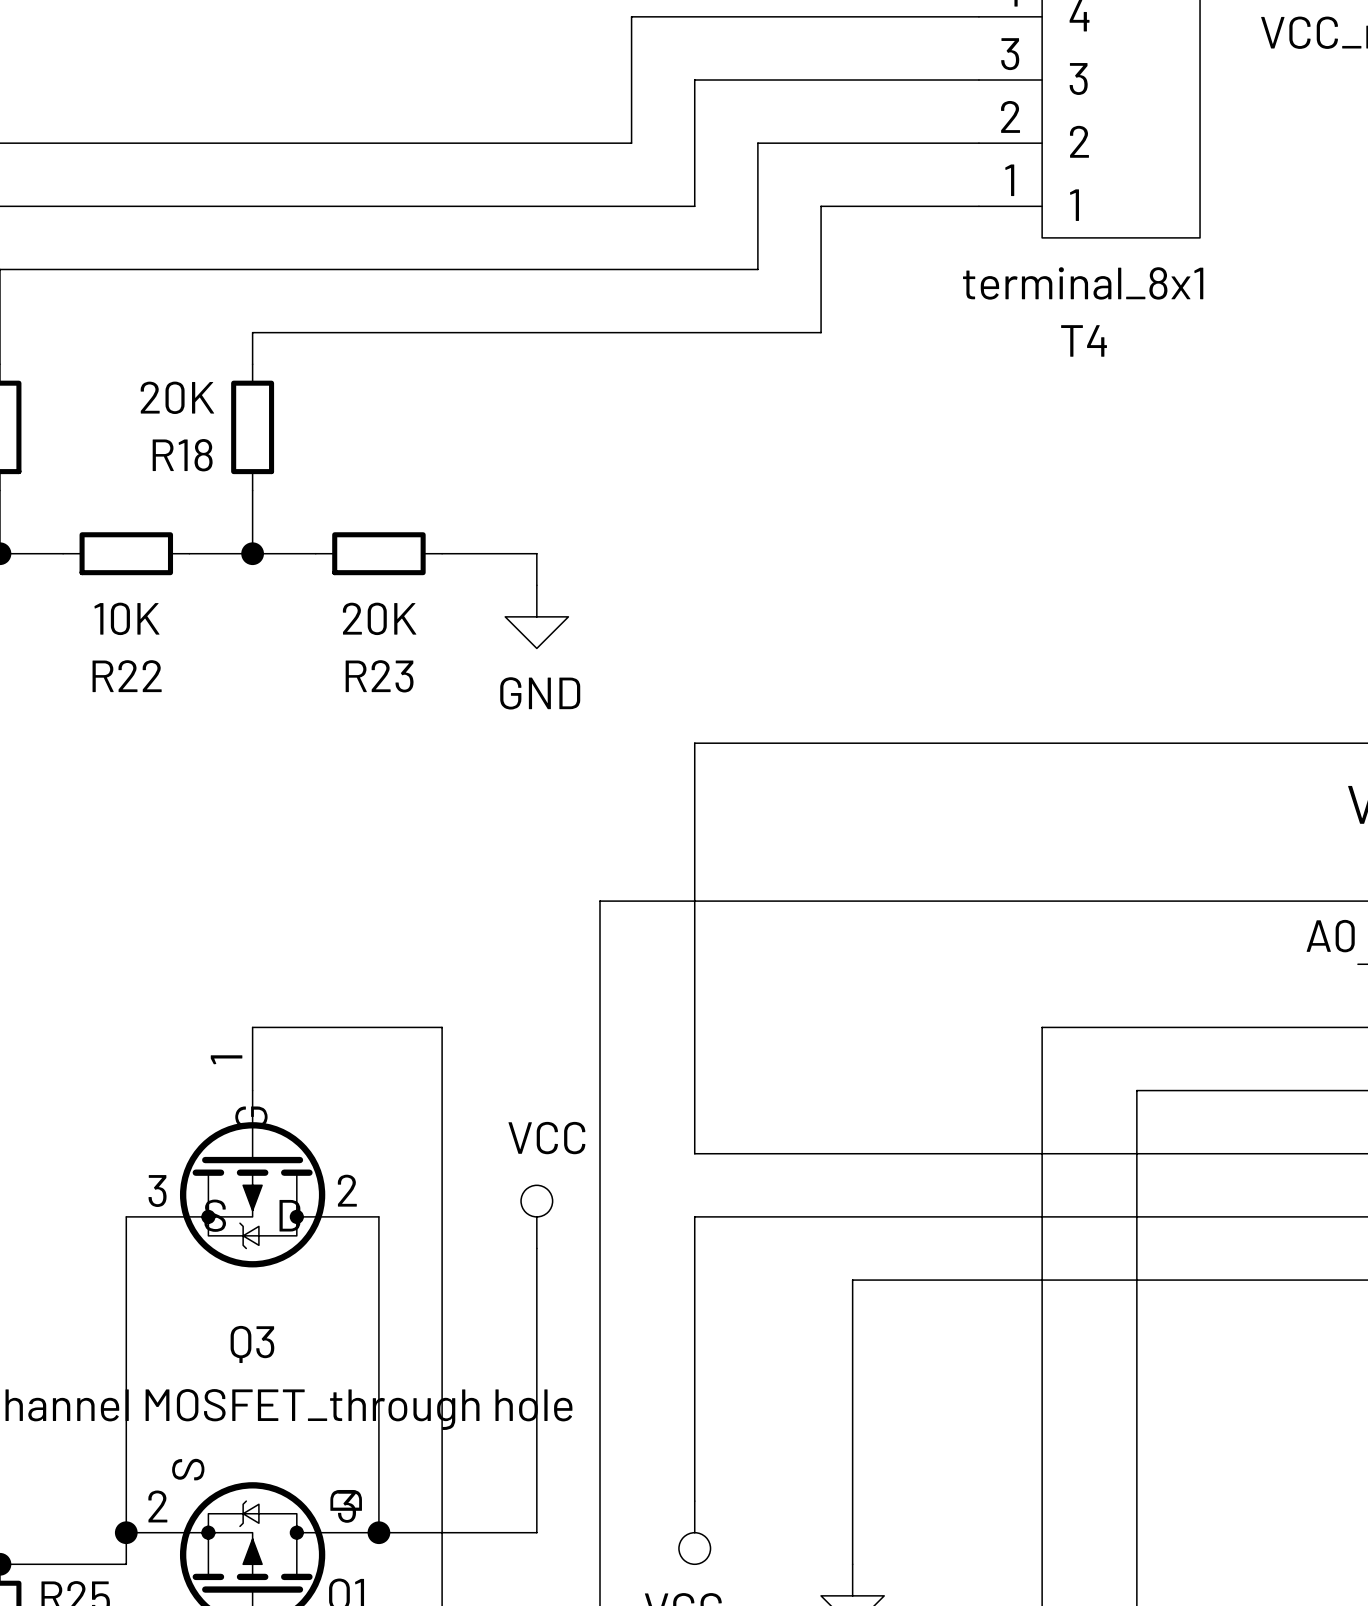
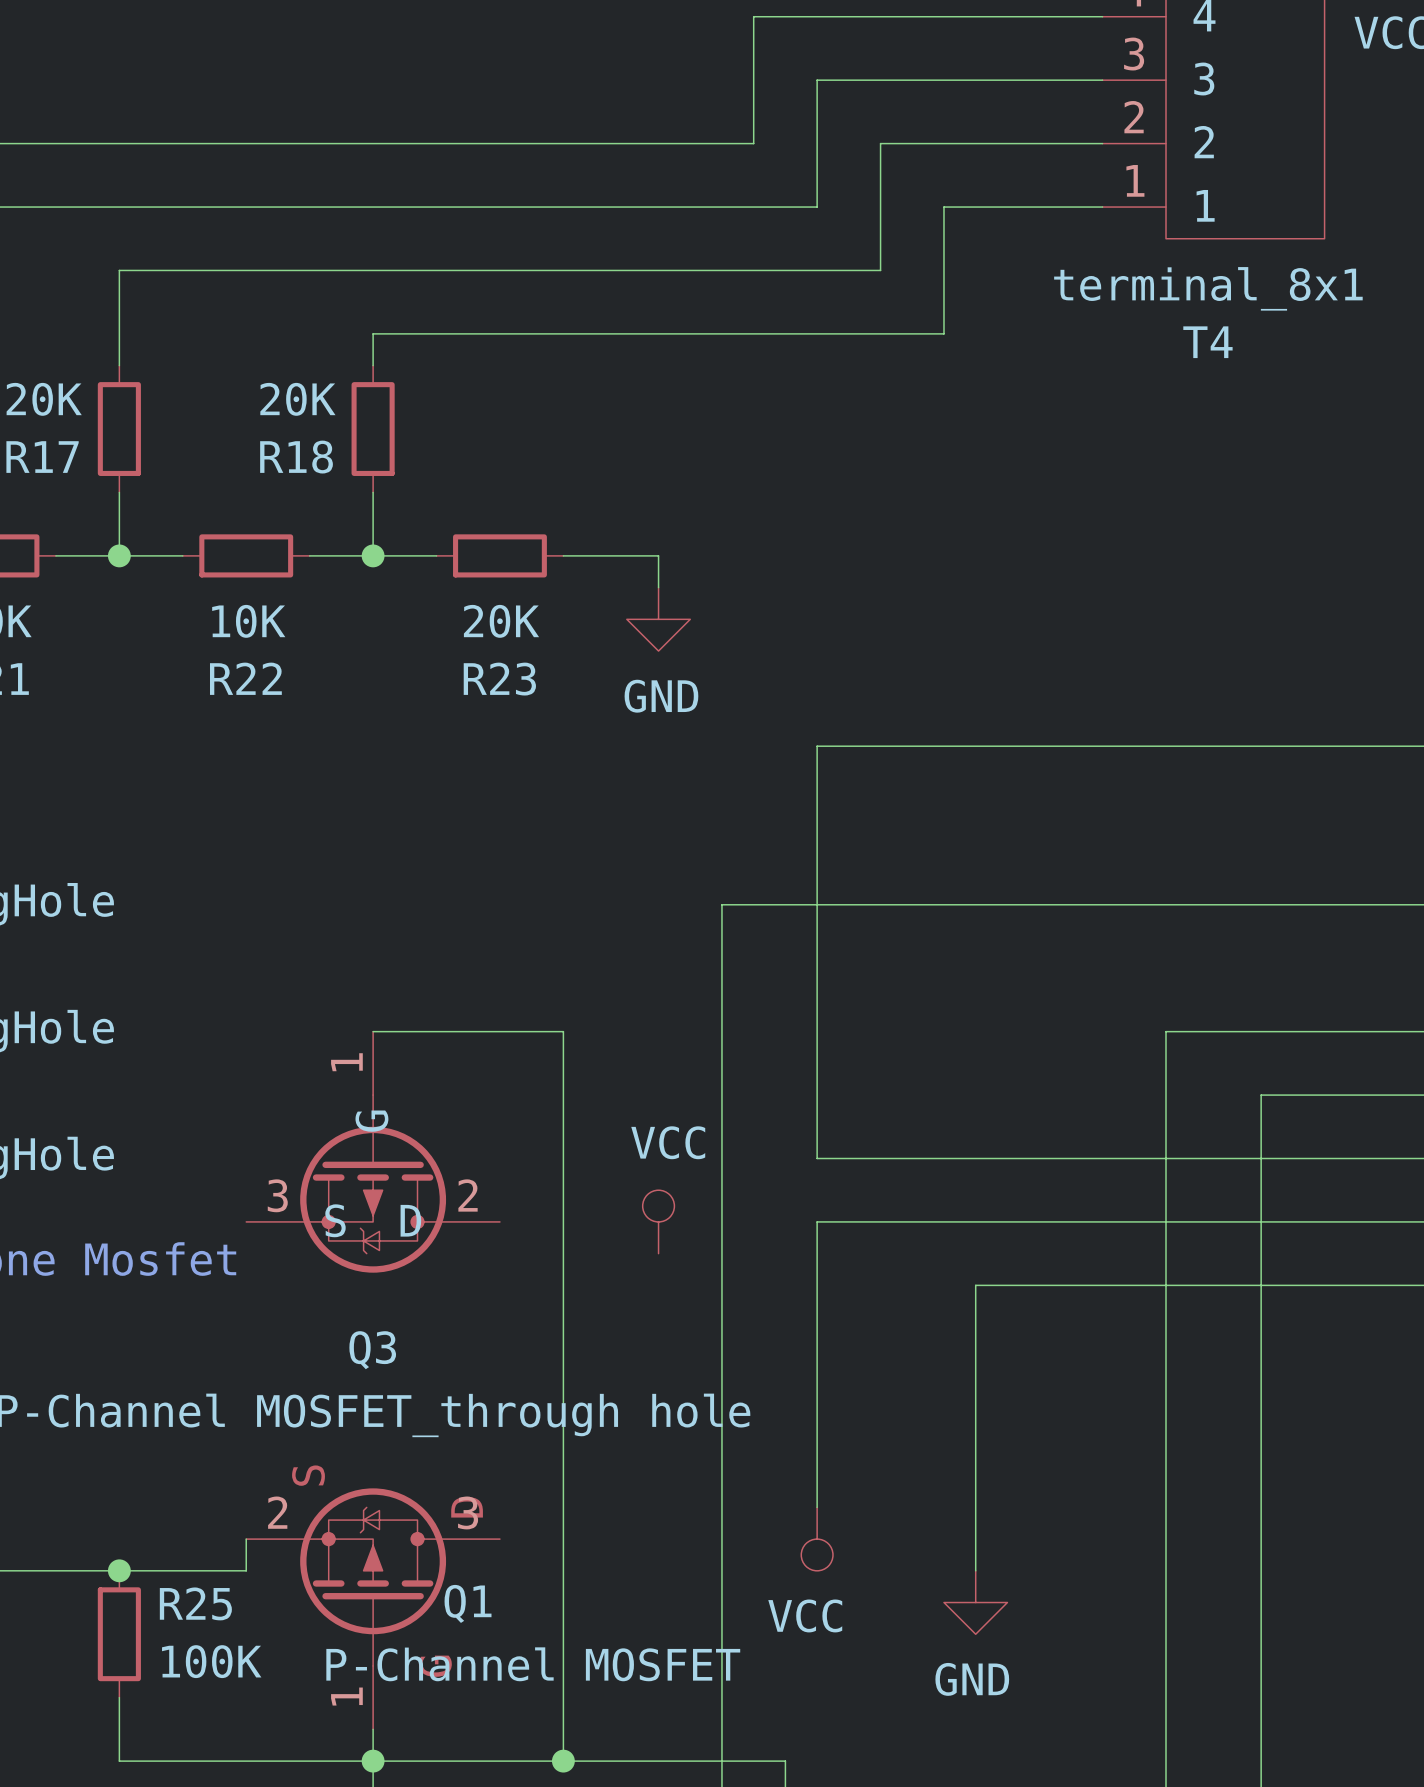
wire: (126, 1216) (126, 1532) -> none
wire: (378, 1216) (378, 1532) (536, 1532) (536, 1248) -> none
junction: (126, 1532) -> none
junction: (378, 1532) -> none

